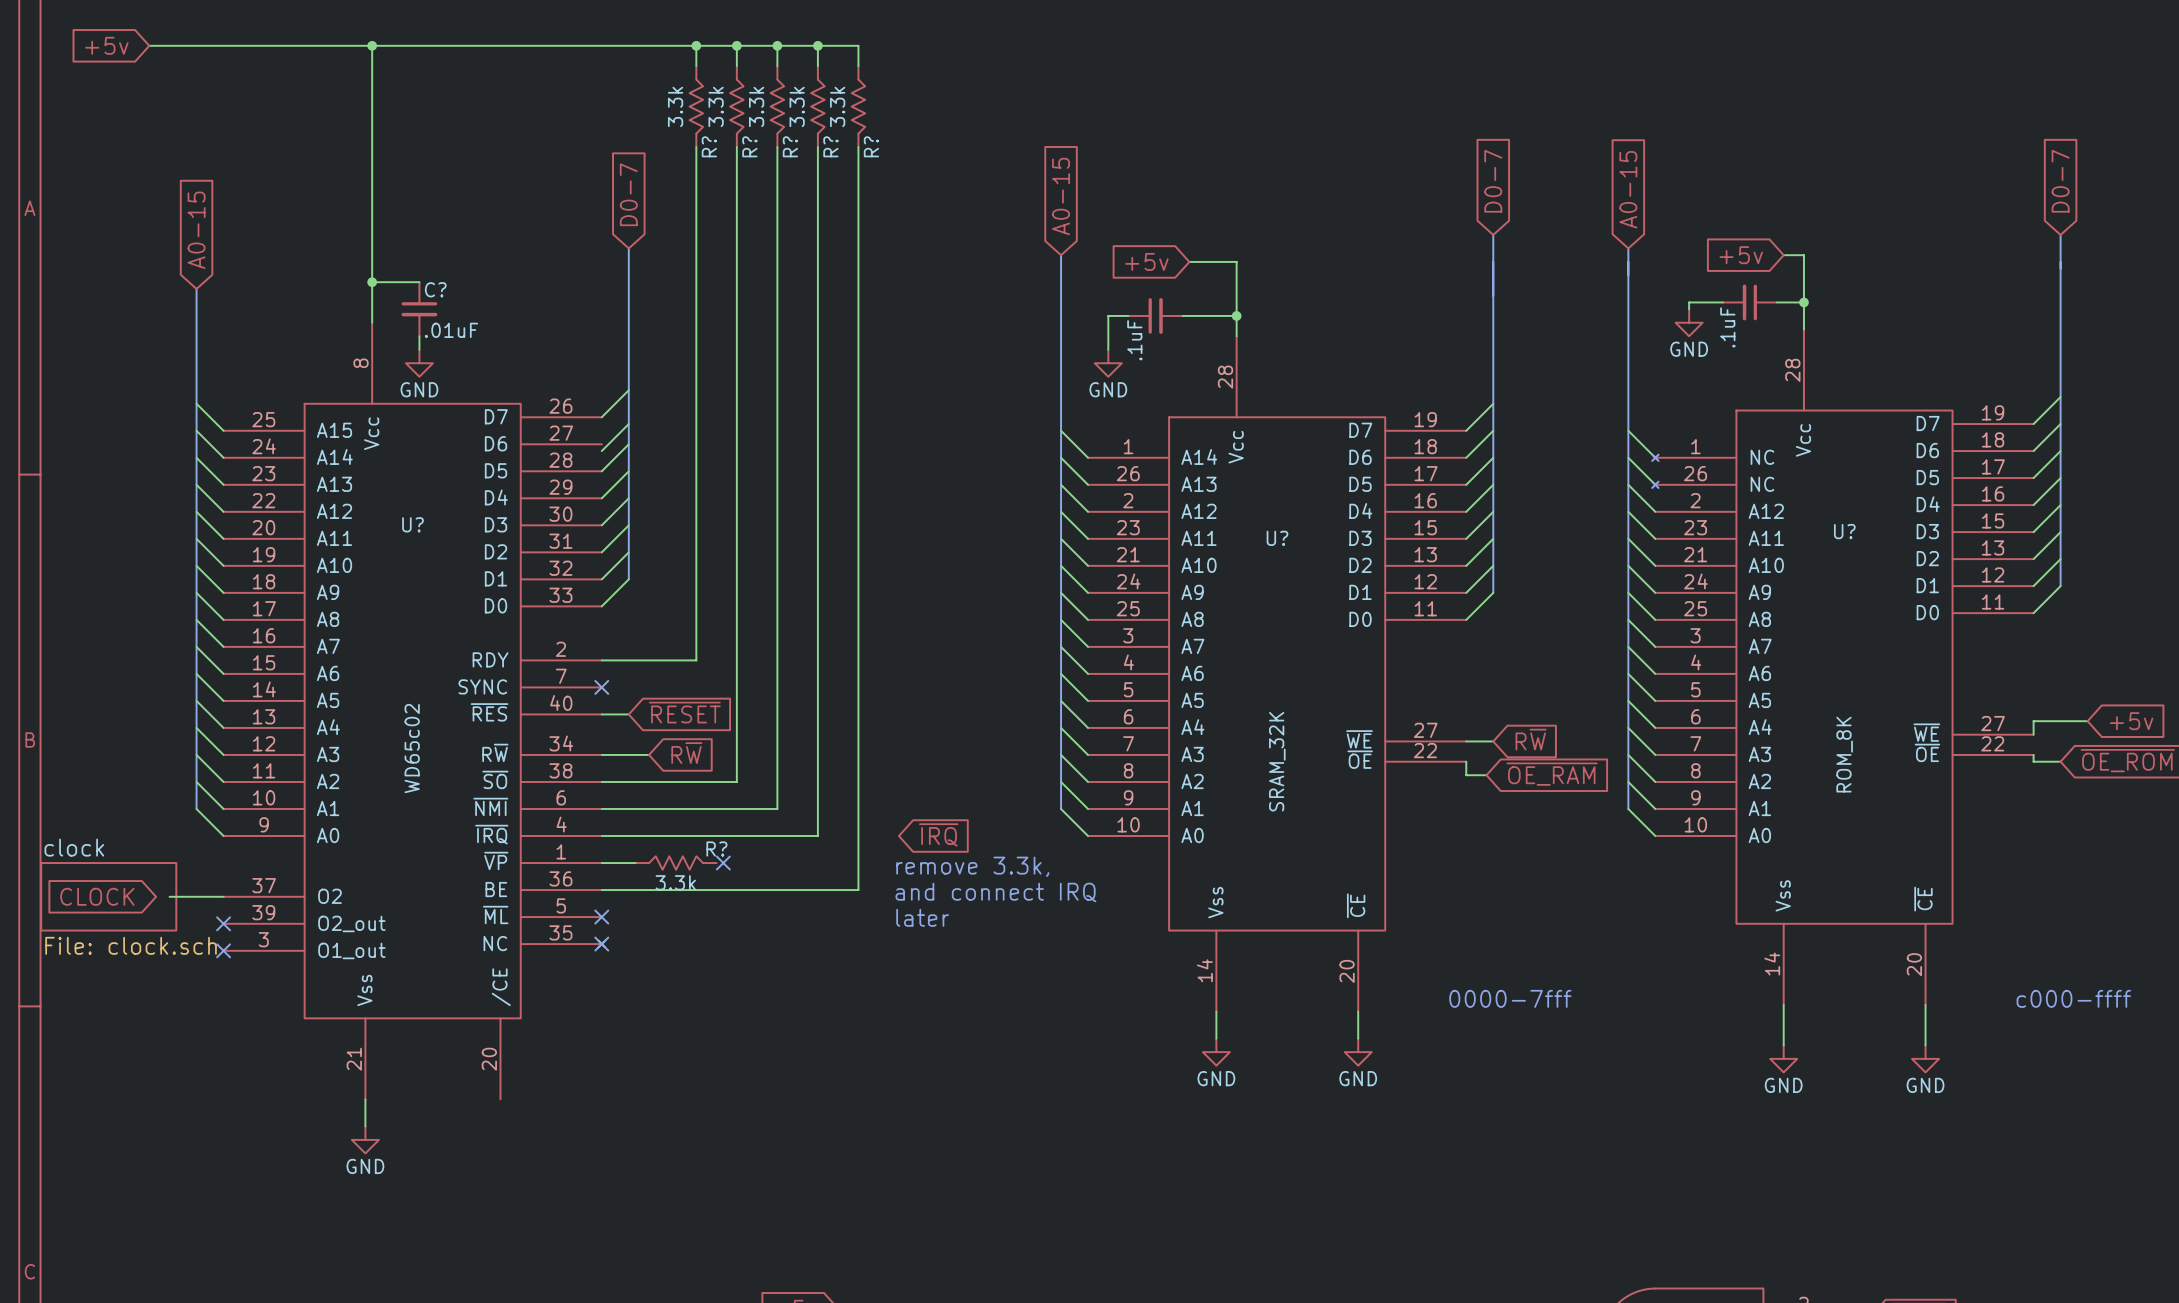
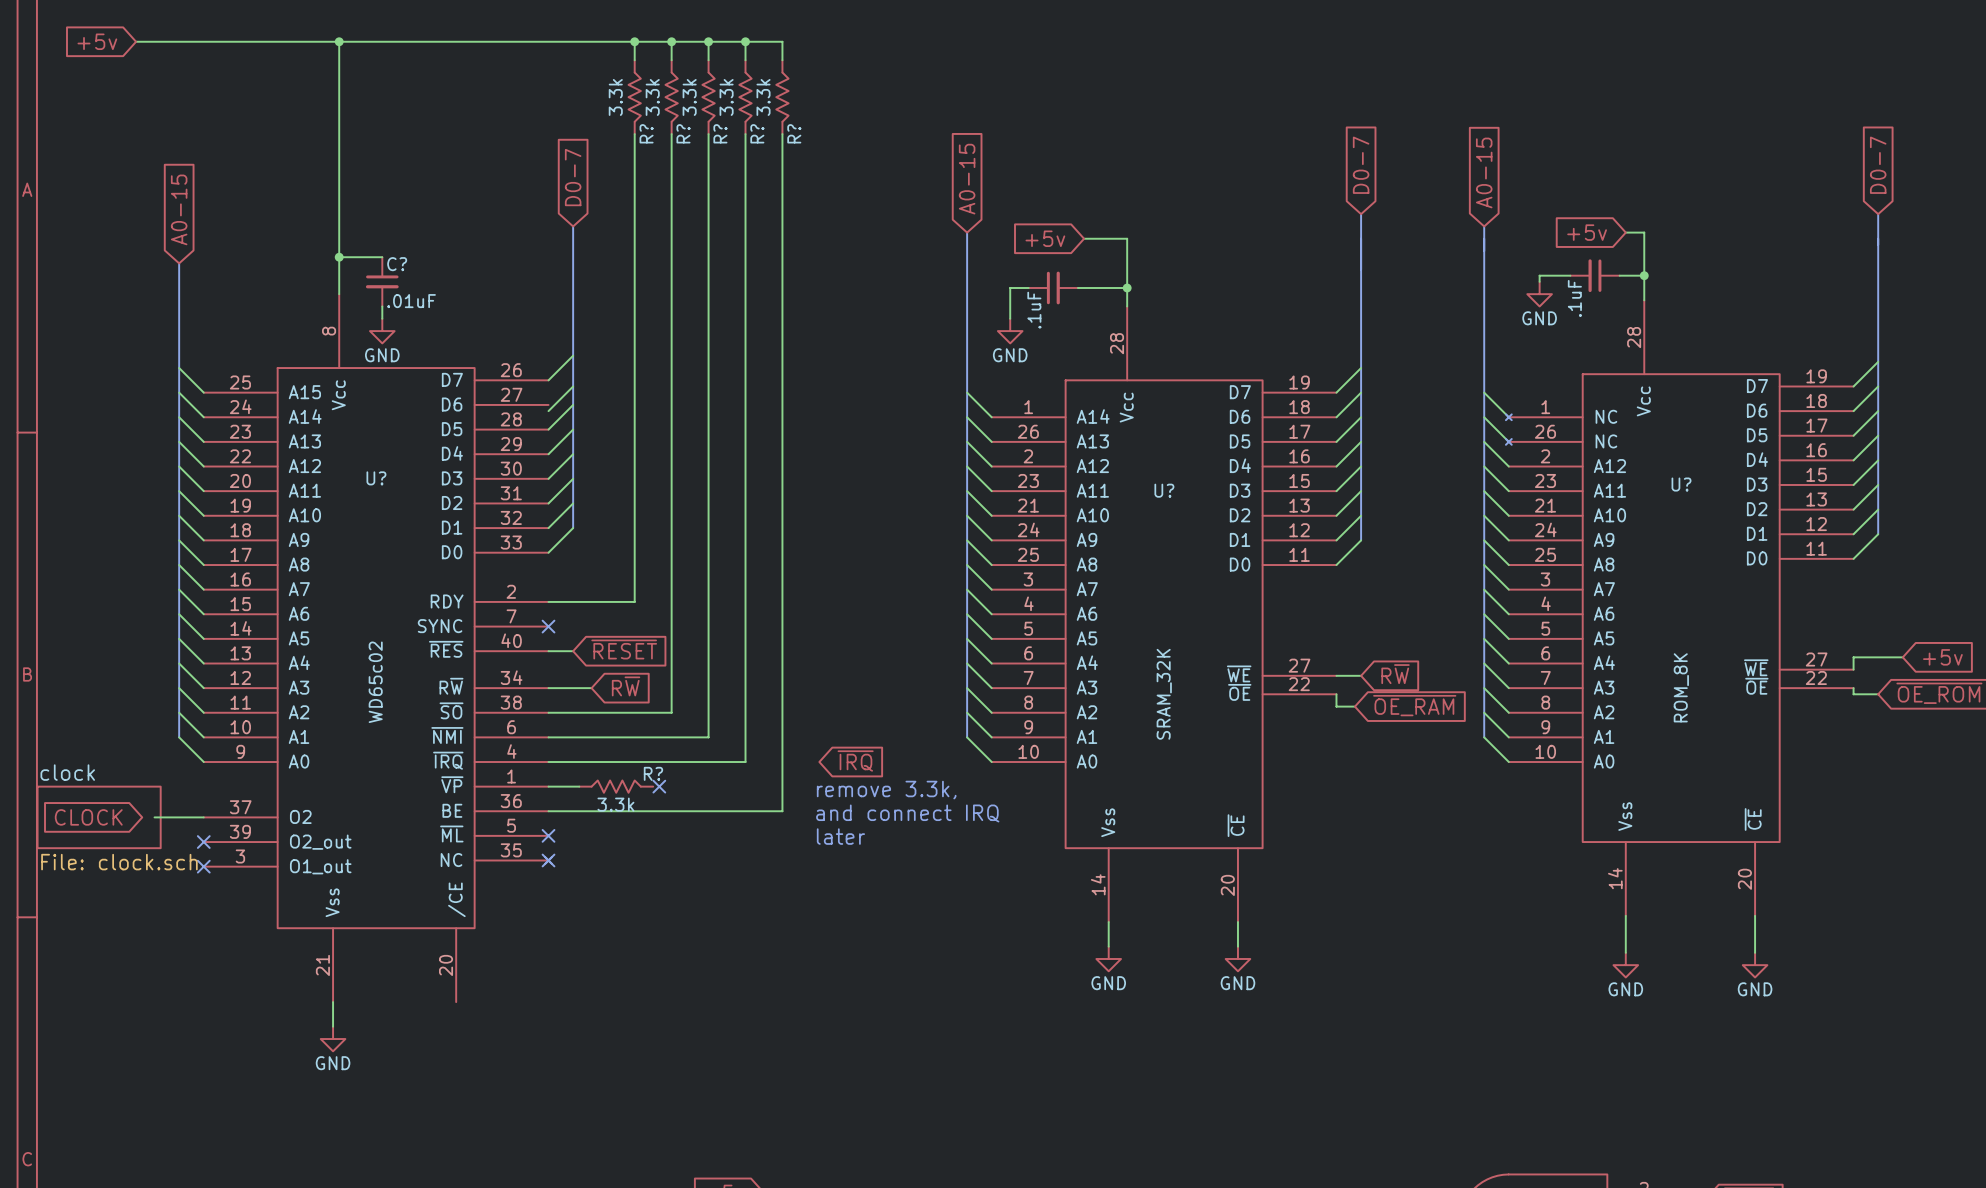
text: 0000-7fff (1510, 998) -> none
text: c000-ffff (2073, 998) -> none

